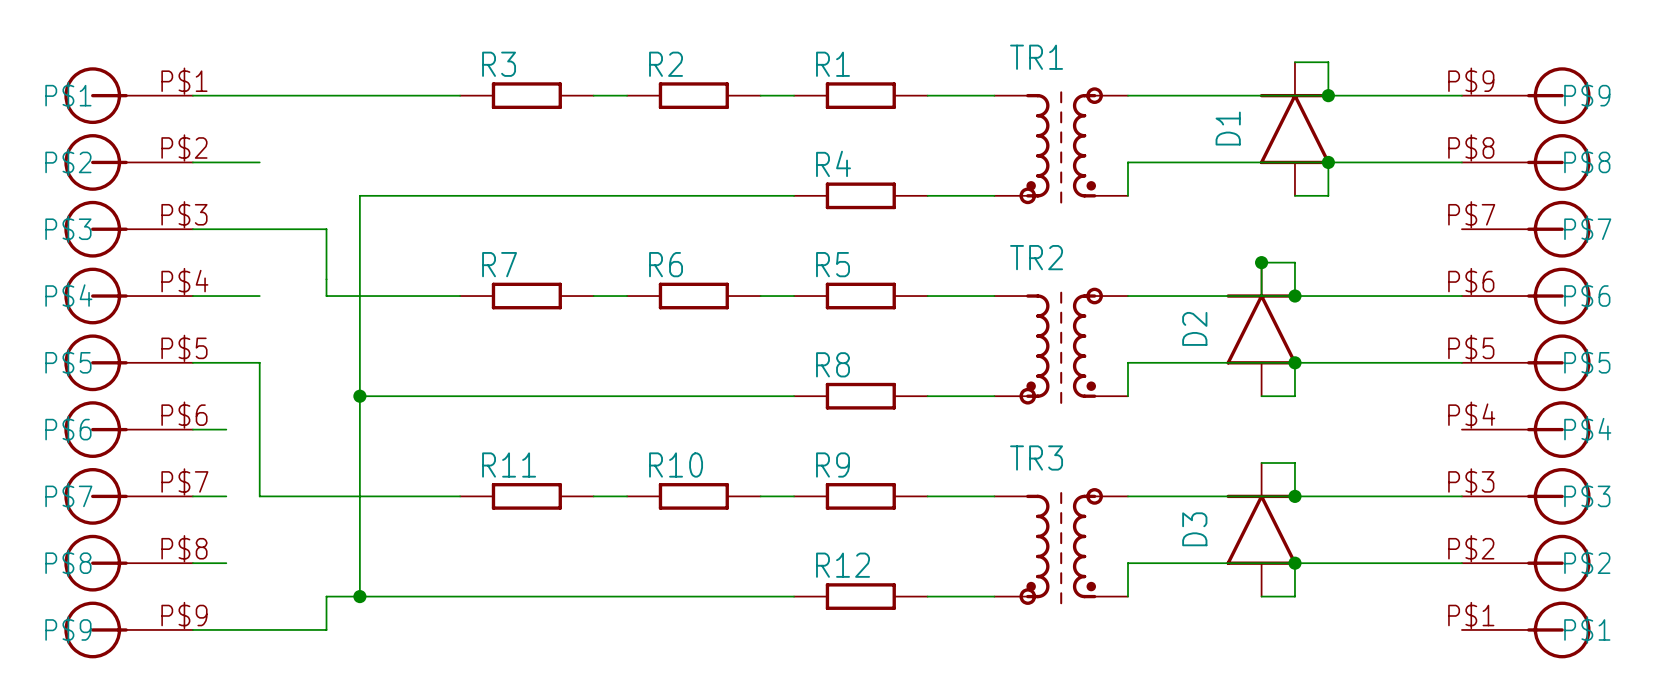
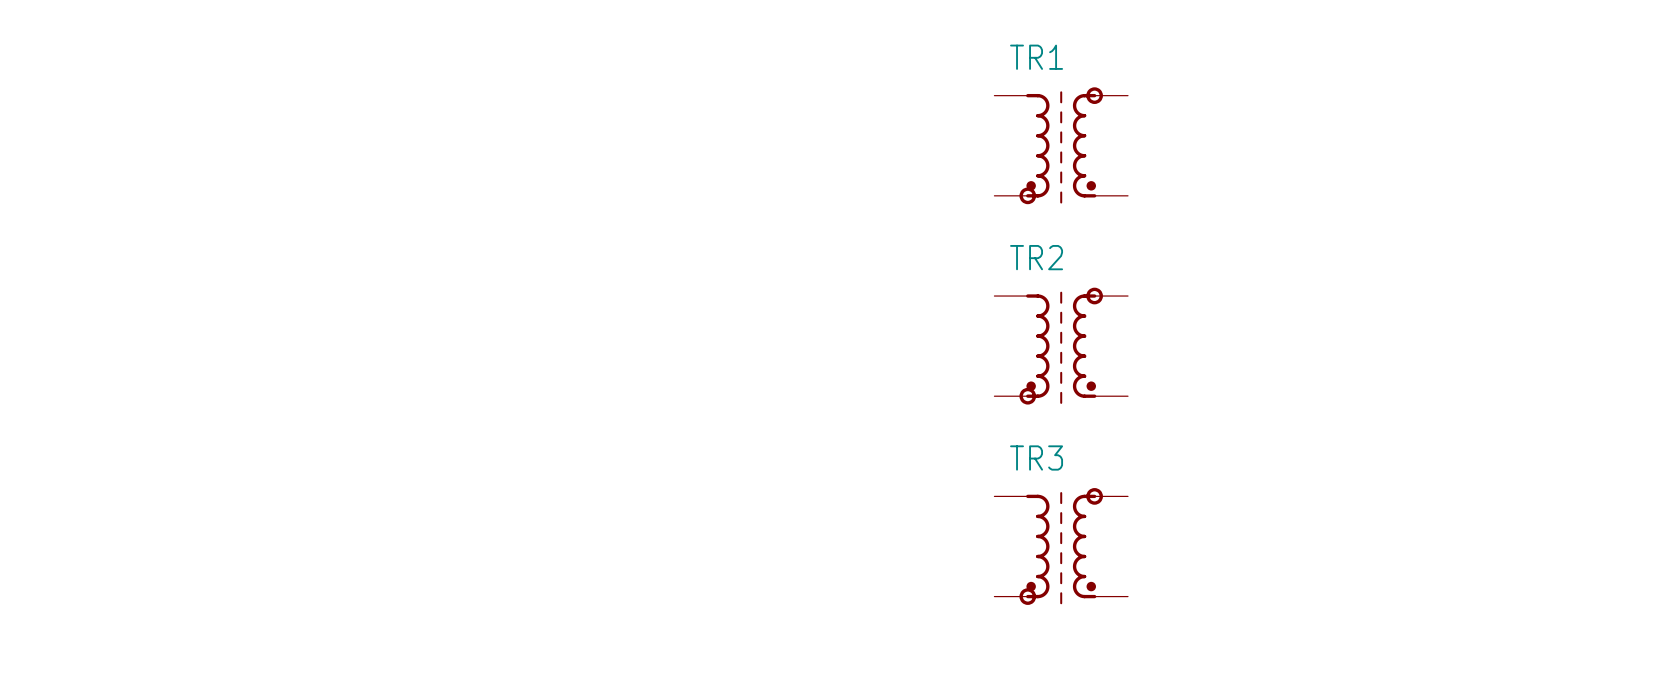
wire: (1294, 62) (1328, 62) (1328, 95) -> none
wire: (192, 95) (460, 95) -> none
R3: (526, 95) -> none
wire: (593, 95) (627, 95) -> none
R2: (693, 95) -> none
wire: (760, 95) (794, 95) -> none
R1: (860, 95) -> none
wire: (927, 95) (994, 95) -> none
wire: (1128, 95) (1461, 95) -> none
junction: (1328, 95) -> none
D1: (1294, 129) -> none
wire: (192, 162) (259, 162) -> none
wire: (1328, 162) (1328, 195) (1294, 195) -> none
junction: (1328, 162) -> none
wire: (1461, 162) (1128, 162) (1128, 195) -> none
wire: (794, 195) (359, 195) (359, 596) -> none
R4: (860, 195) -> none
wire: (927, 195) (994, 195) -> none
wire: (192, 229) (326, 229) (326, 296) (460, 296) -> none
junction: (1261, 262) -> none
wire: (192, 296) (259, 296) -> none
R7: (526, 296) -> none
wire: (593, 296) (627, 296) -> none
R6: (693, 296) -> none
wire: (760, 296) (794, 296) -> none
R5: (860, 296) -> none
wire: (927, 296) (994, 296) -> none
wire: (1128, 296) (1461, 296) -> none
wire: (1261, 296) (1261, 262) (1294, 262) (1294, 296) -> none
junction: (1294, 296) -> none
D2: (1261, 329) -> none
part: (128, 362) -> none
wire: (192, 362) (259, 362) (259, 496) (460, 496) -> none
wire: (1294, 362) (1294, 396) (1261, 396) -> none
junction: (1294, 362) -> none
wire: (1461, 362) (1128, 362) (1128, 396) -> none
part: (1526, 362) -> none
wire: (359, 396) (794, 396) -> none
junction: (359, 396) -> none
R8: (860, 396) -> none
wire: (927, 396) (994, 396) -> none
wire: (192, 429) (226, 429) -> none
wire: (1261, 463) (1294, 463) (1294, 496) -> none
wire: (192, 496) (226, 496) -> none
R11: (526, 496) -> none
wire: (593, 496) (627, 496) -> none
R10: (693, 496) -> none
wire: (760, 496) (794, 496) -> none
R9: (860, 496) -> none
wire: (927, 496) (994, 496) -> none
wire: (1128, 496) (1461, 496) -> none
junction: (1294, 496) -> none
D3: (1261, 529) -> none
wire: (192, 563) (226, 563) -> none
wire: (1294, 563) (1294, 596) (1261, 596) -> none
junction: (1294, 563) -> none
wire: (1461, 563) (1128, 563) (1128, 596) -> none
junction: (359, 596) -> none
wire: (794, 596) (326, 596) (326, 629) (192, 629) -> none
R12: (860, 596) -> none
wire: (927, 596) (994, 596) -> none

